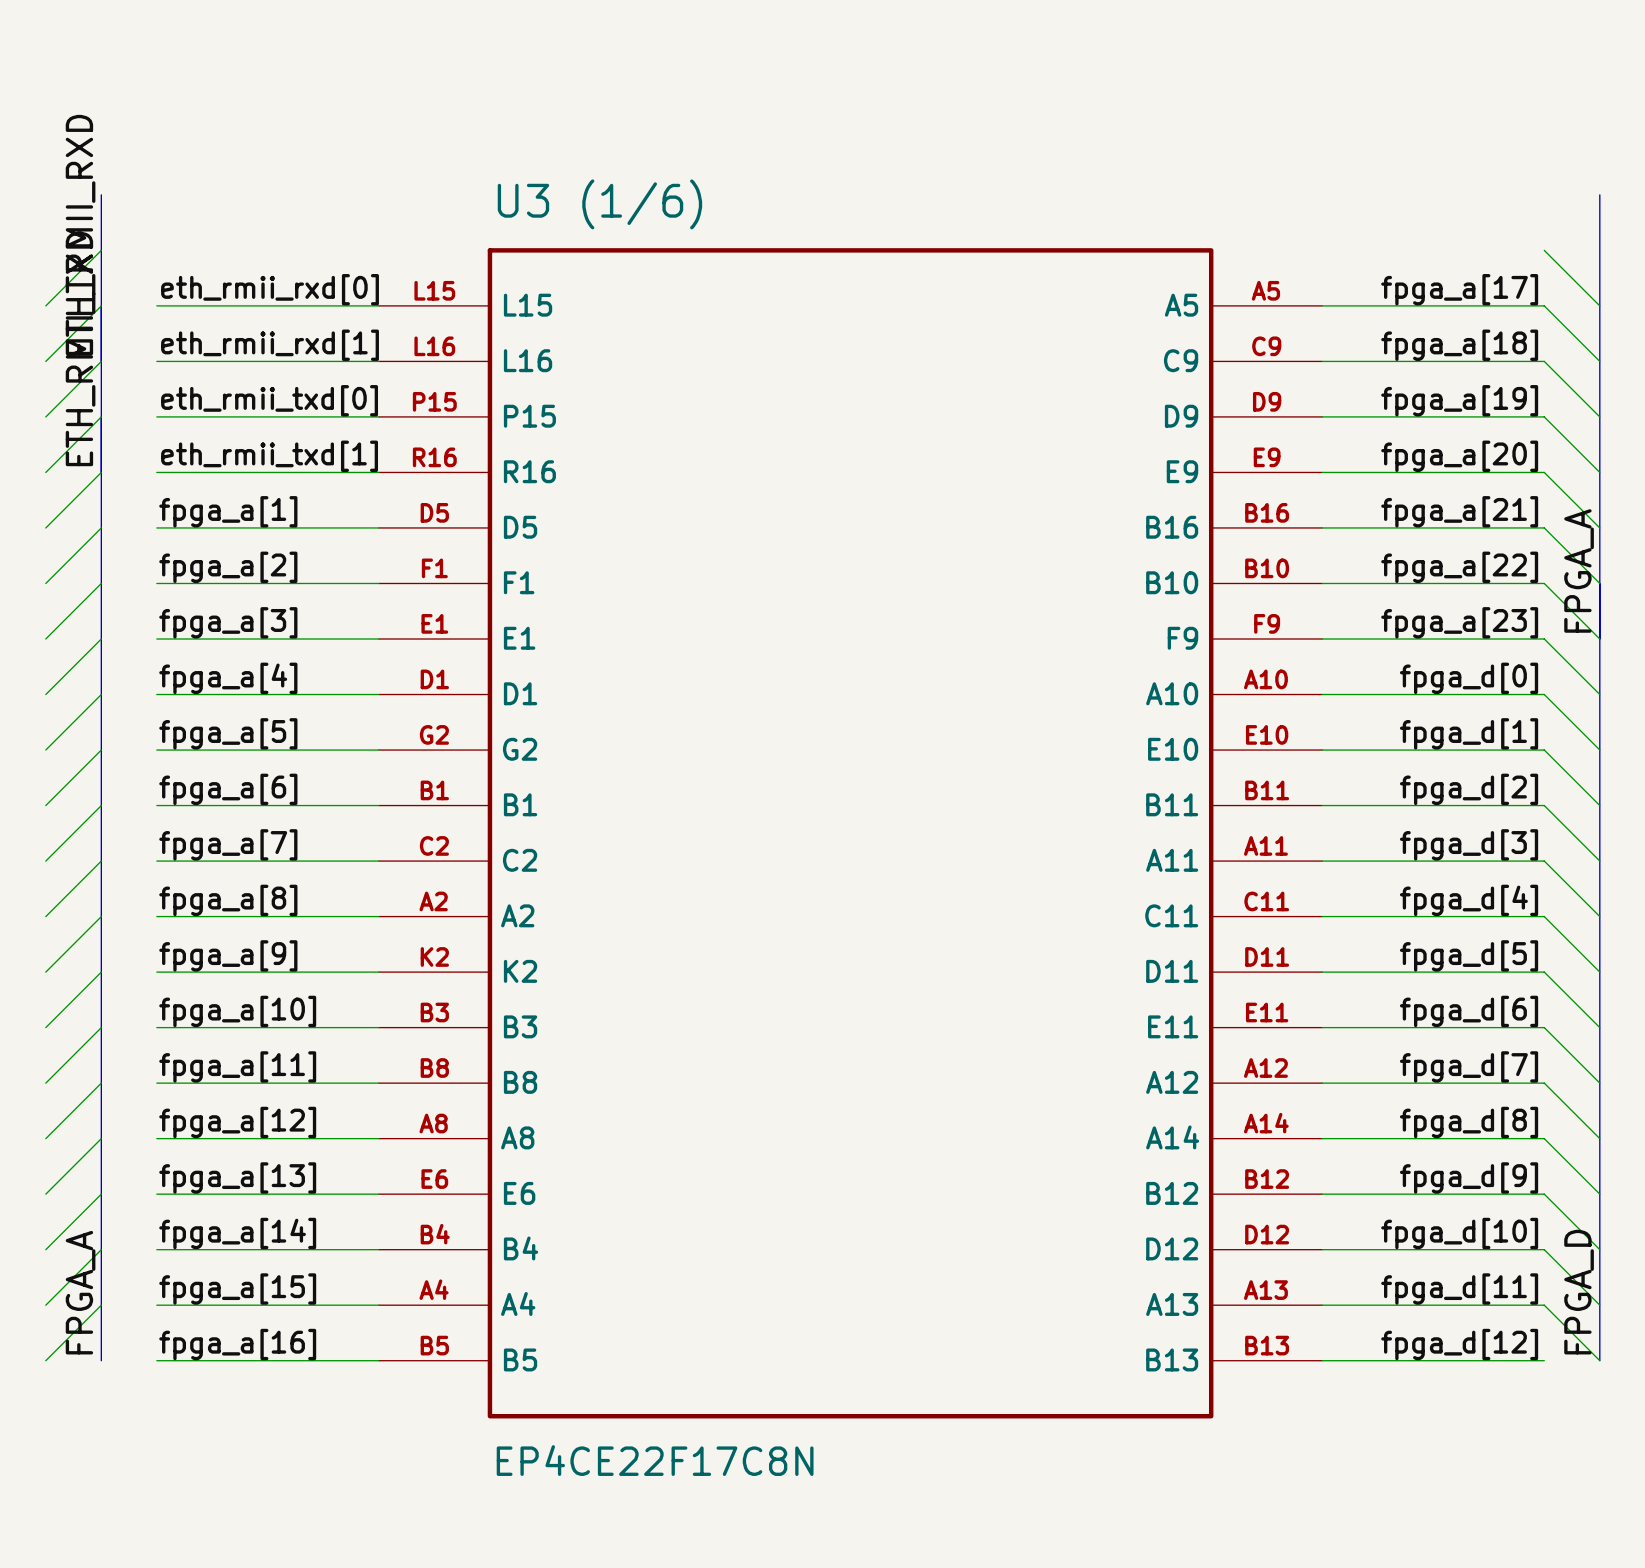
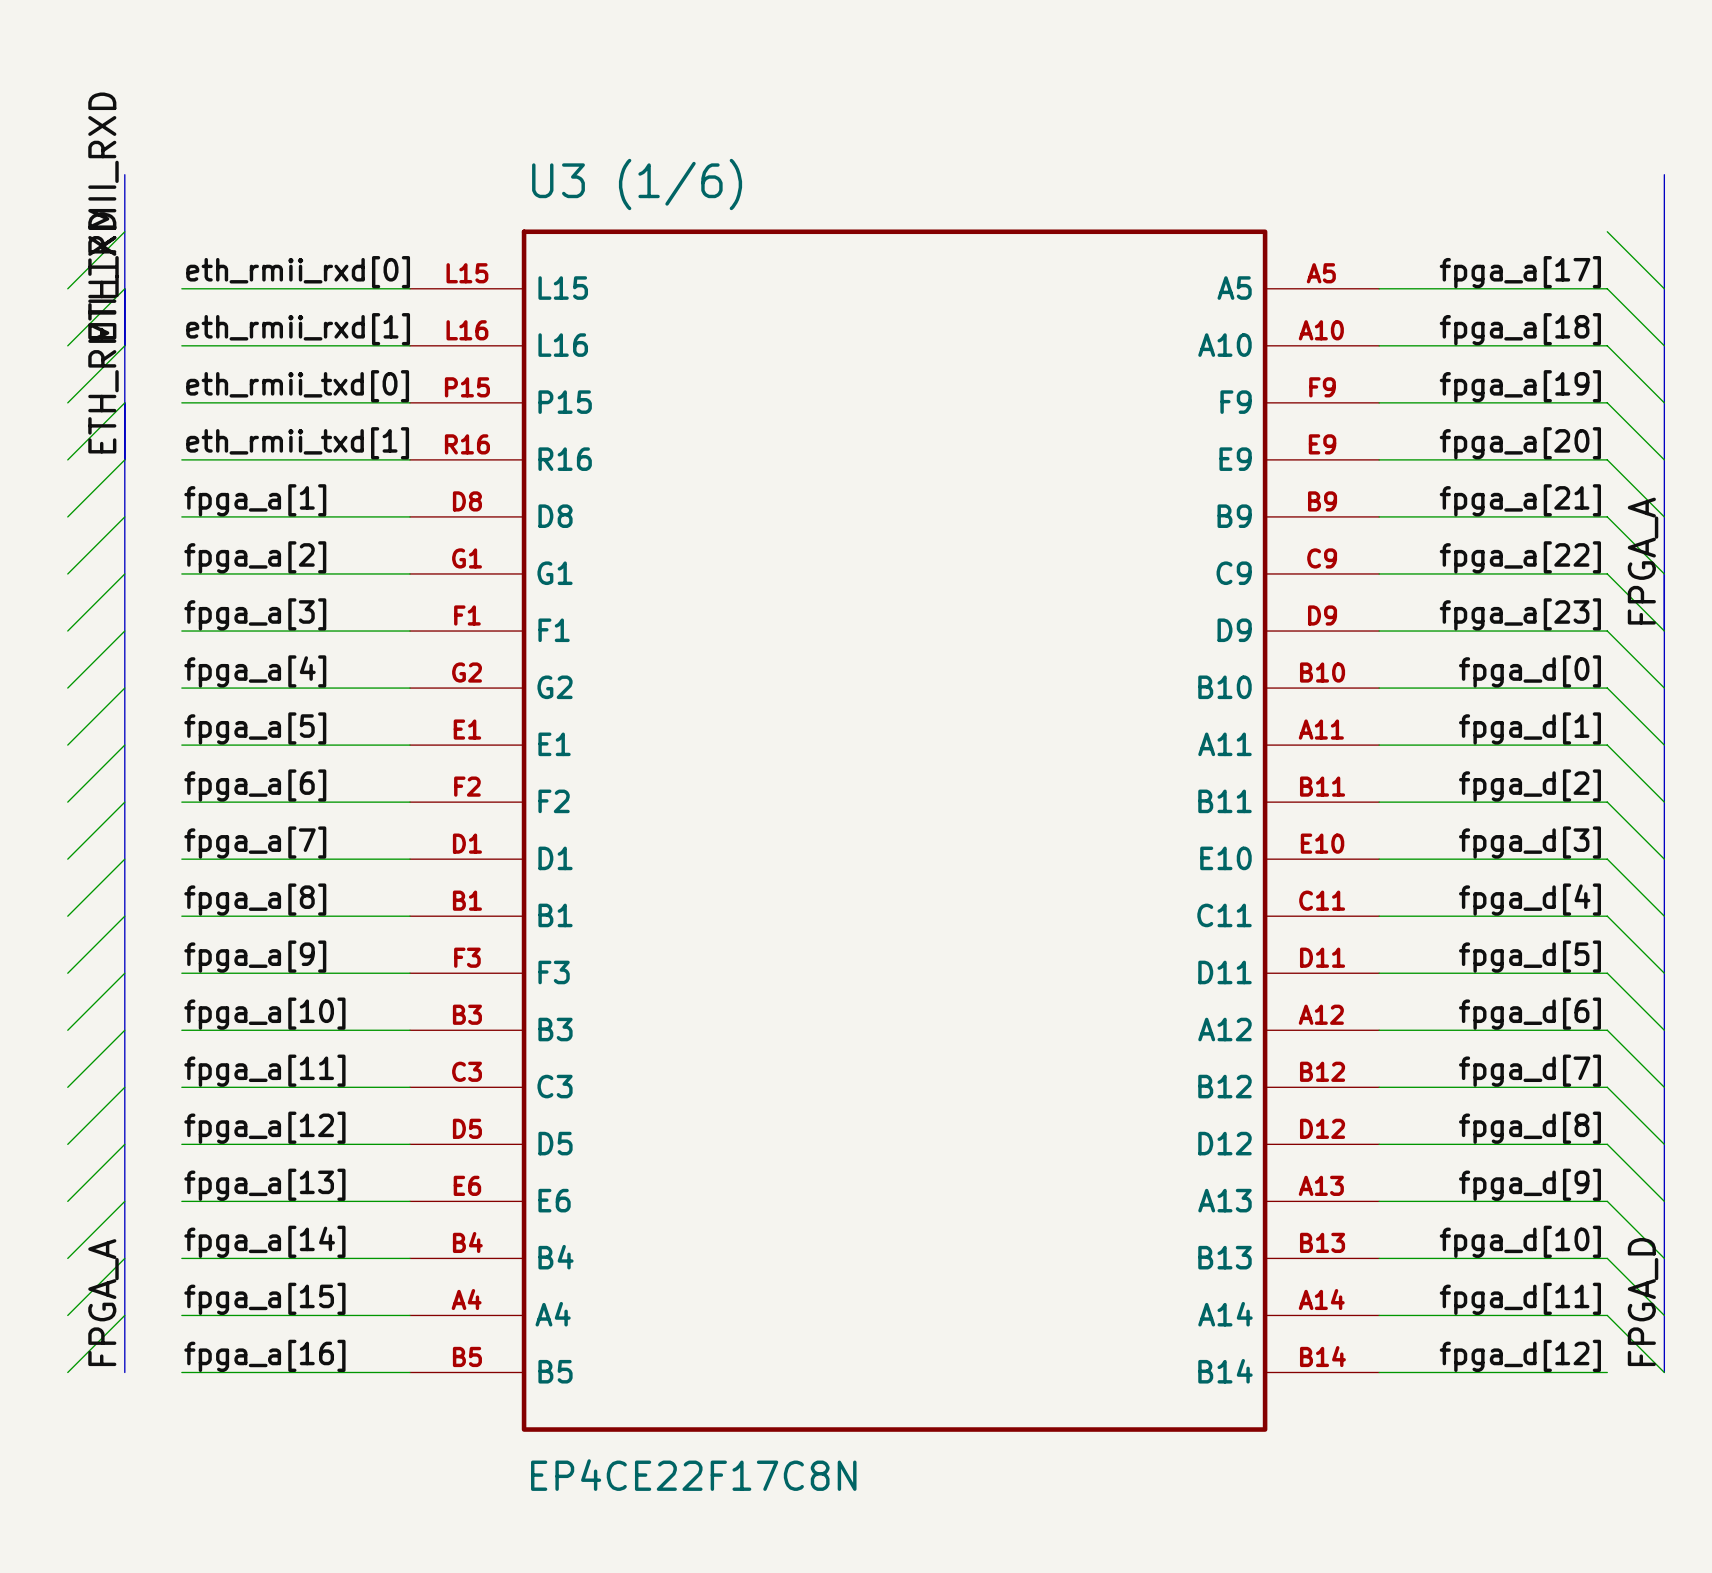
U3 (1/6) symbol: [378, 248, 1323, 1419] -> [409, 229, 1380, 1432]

